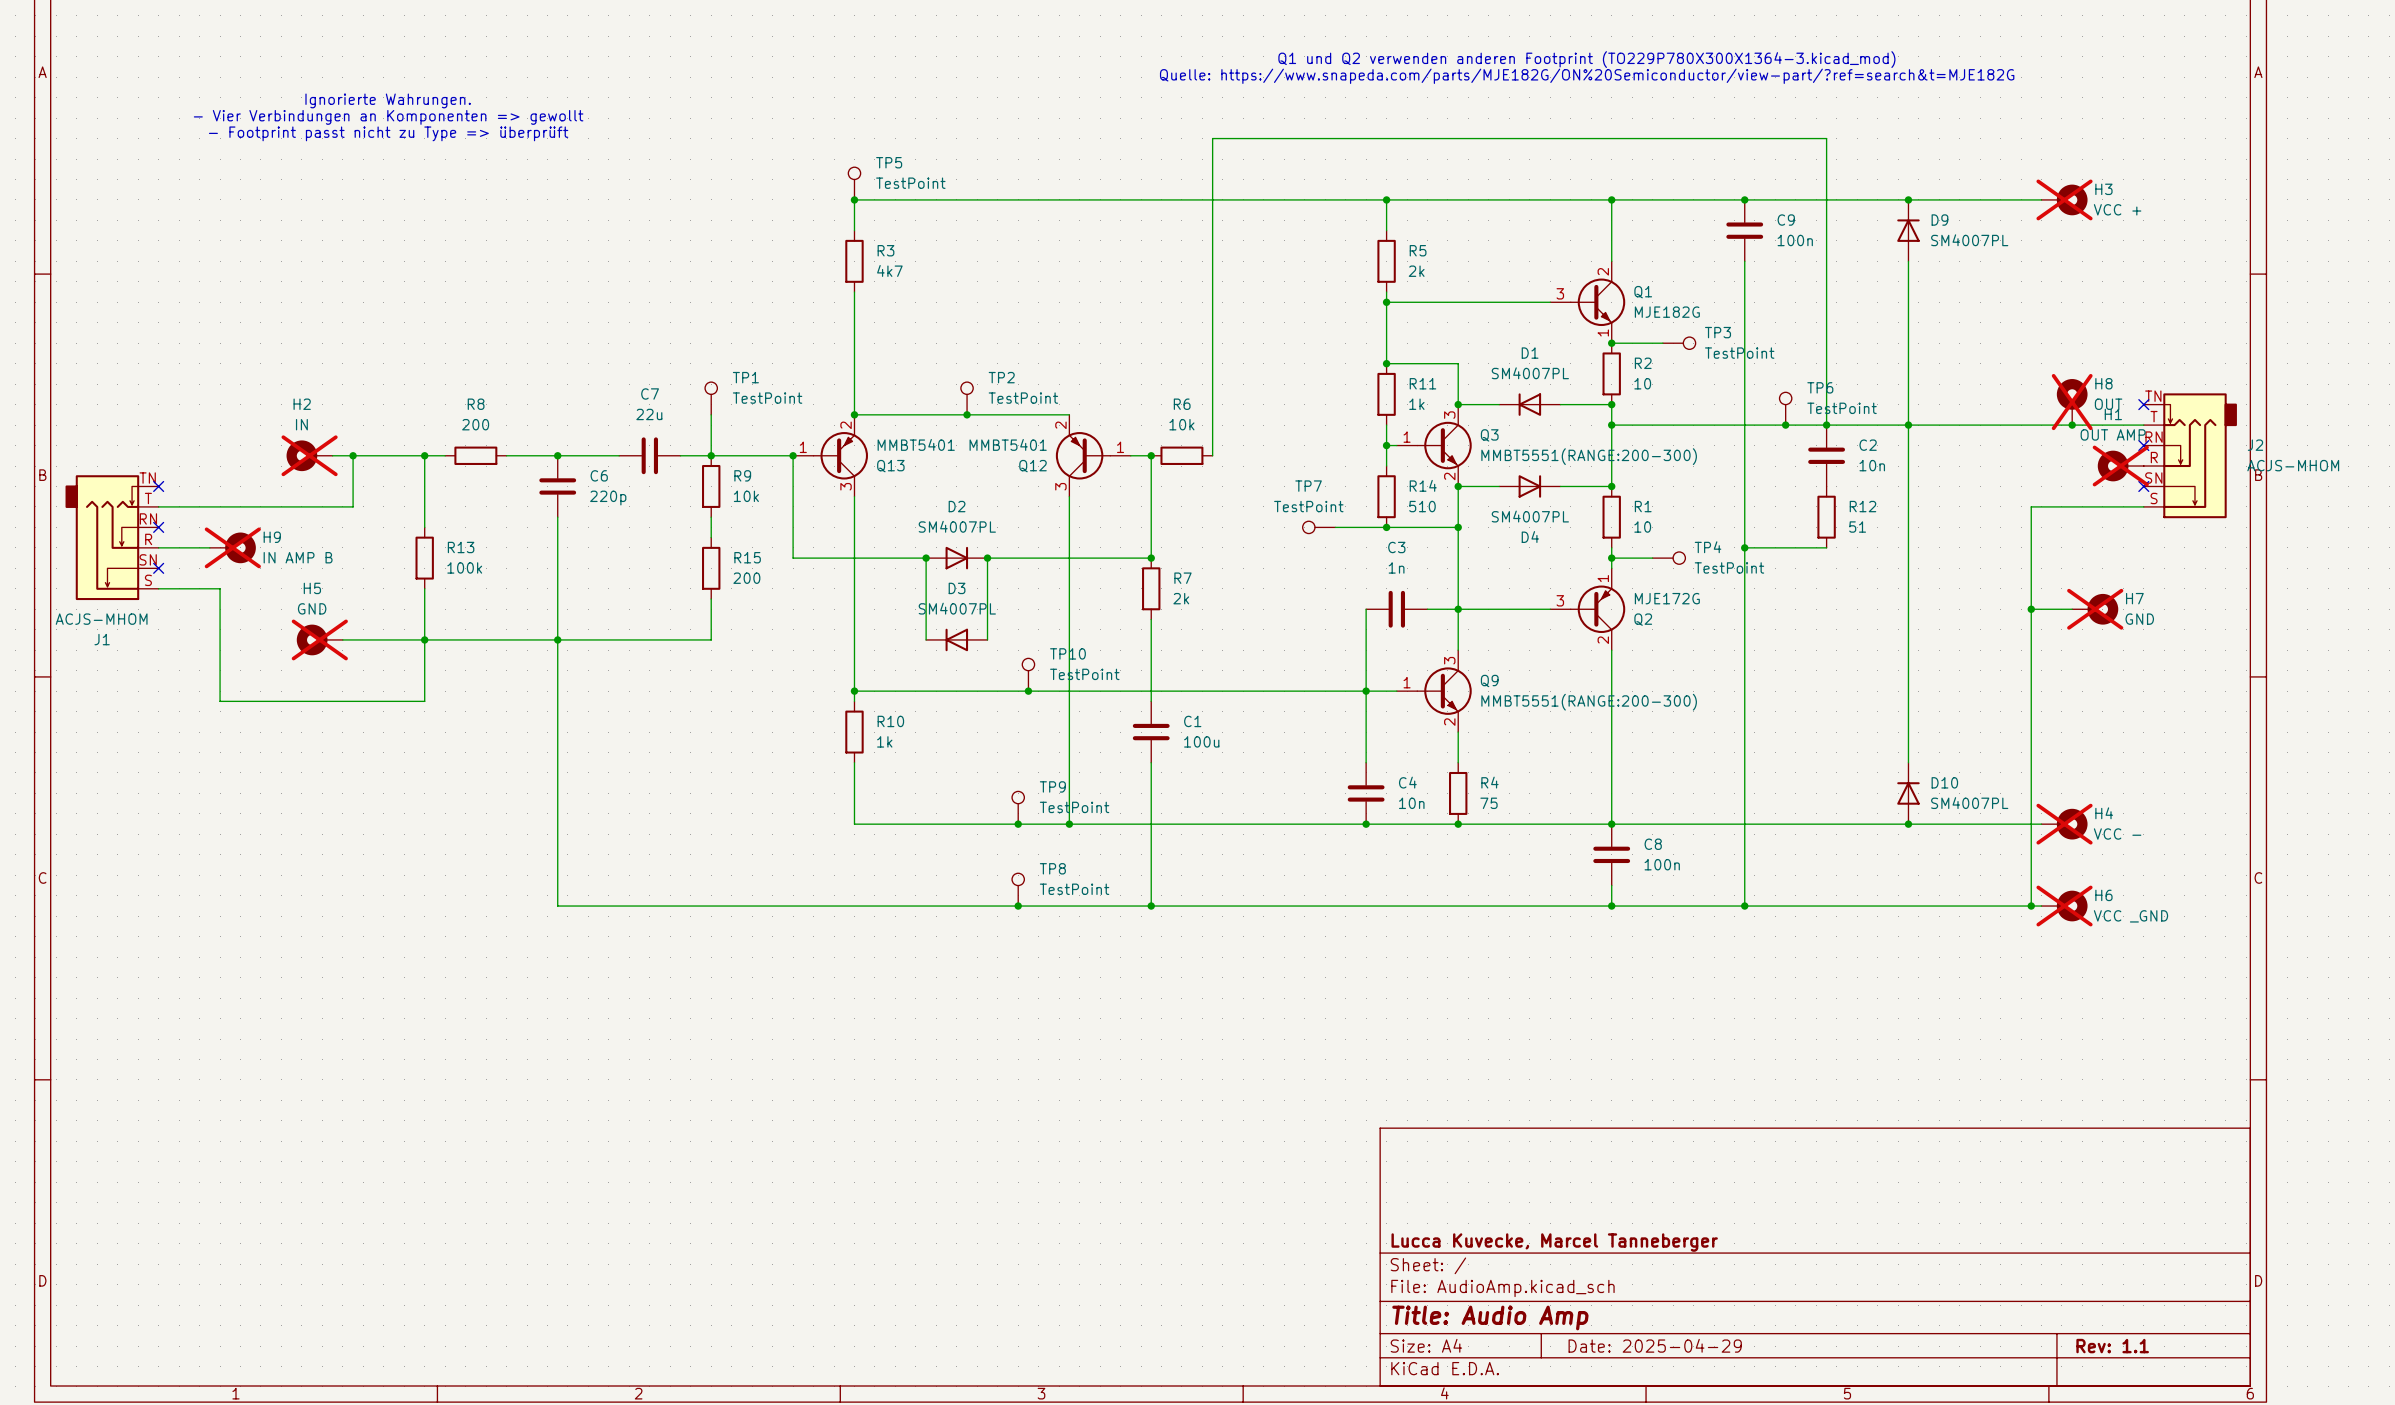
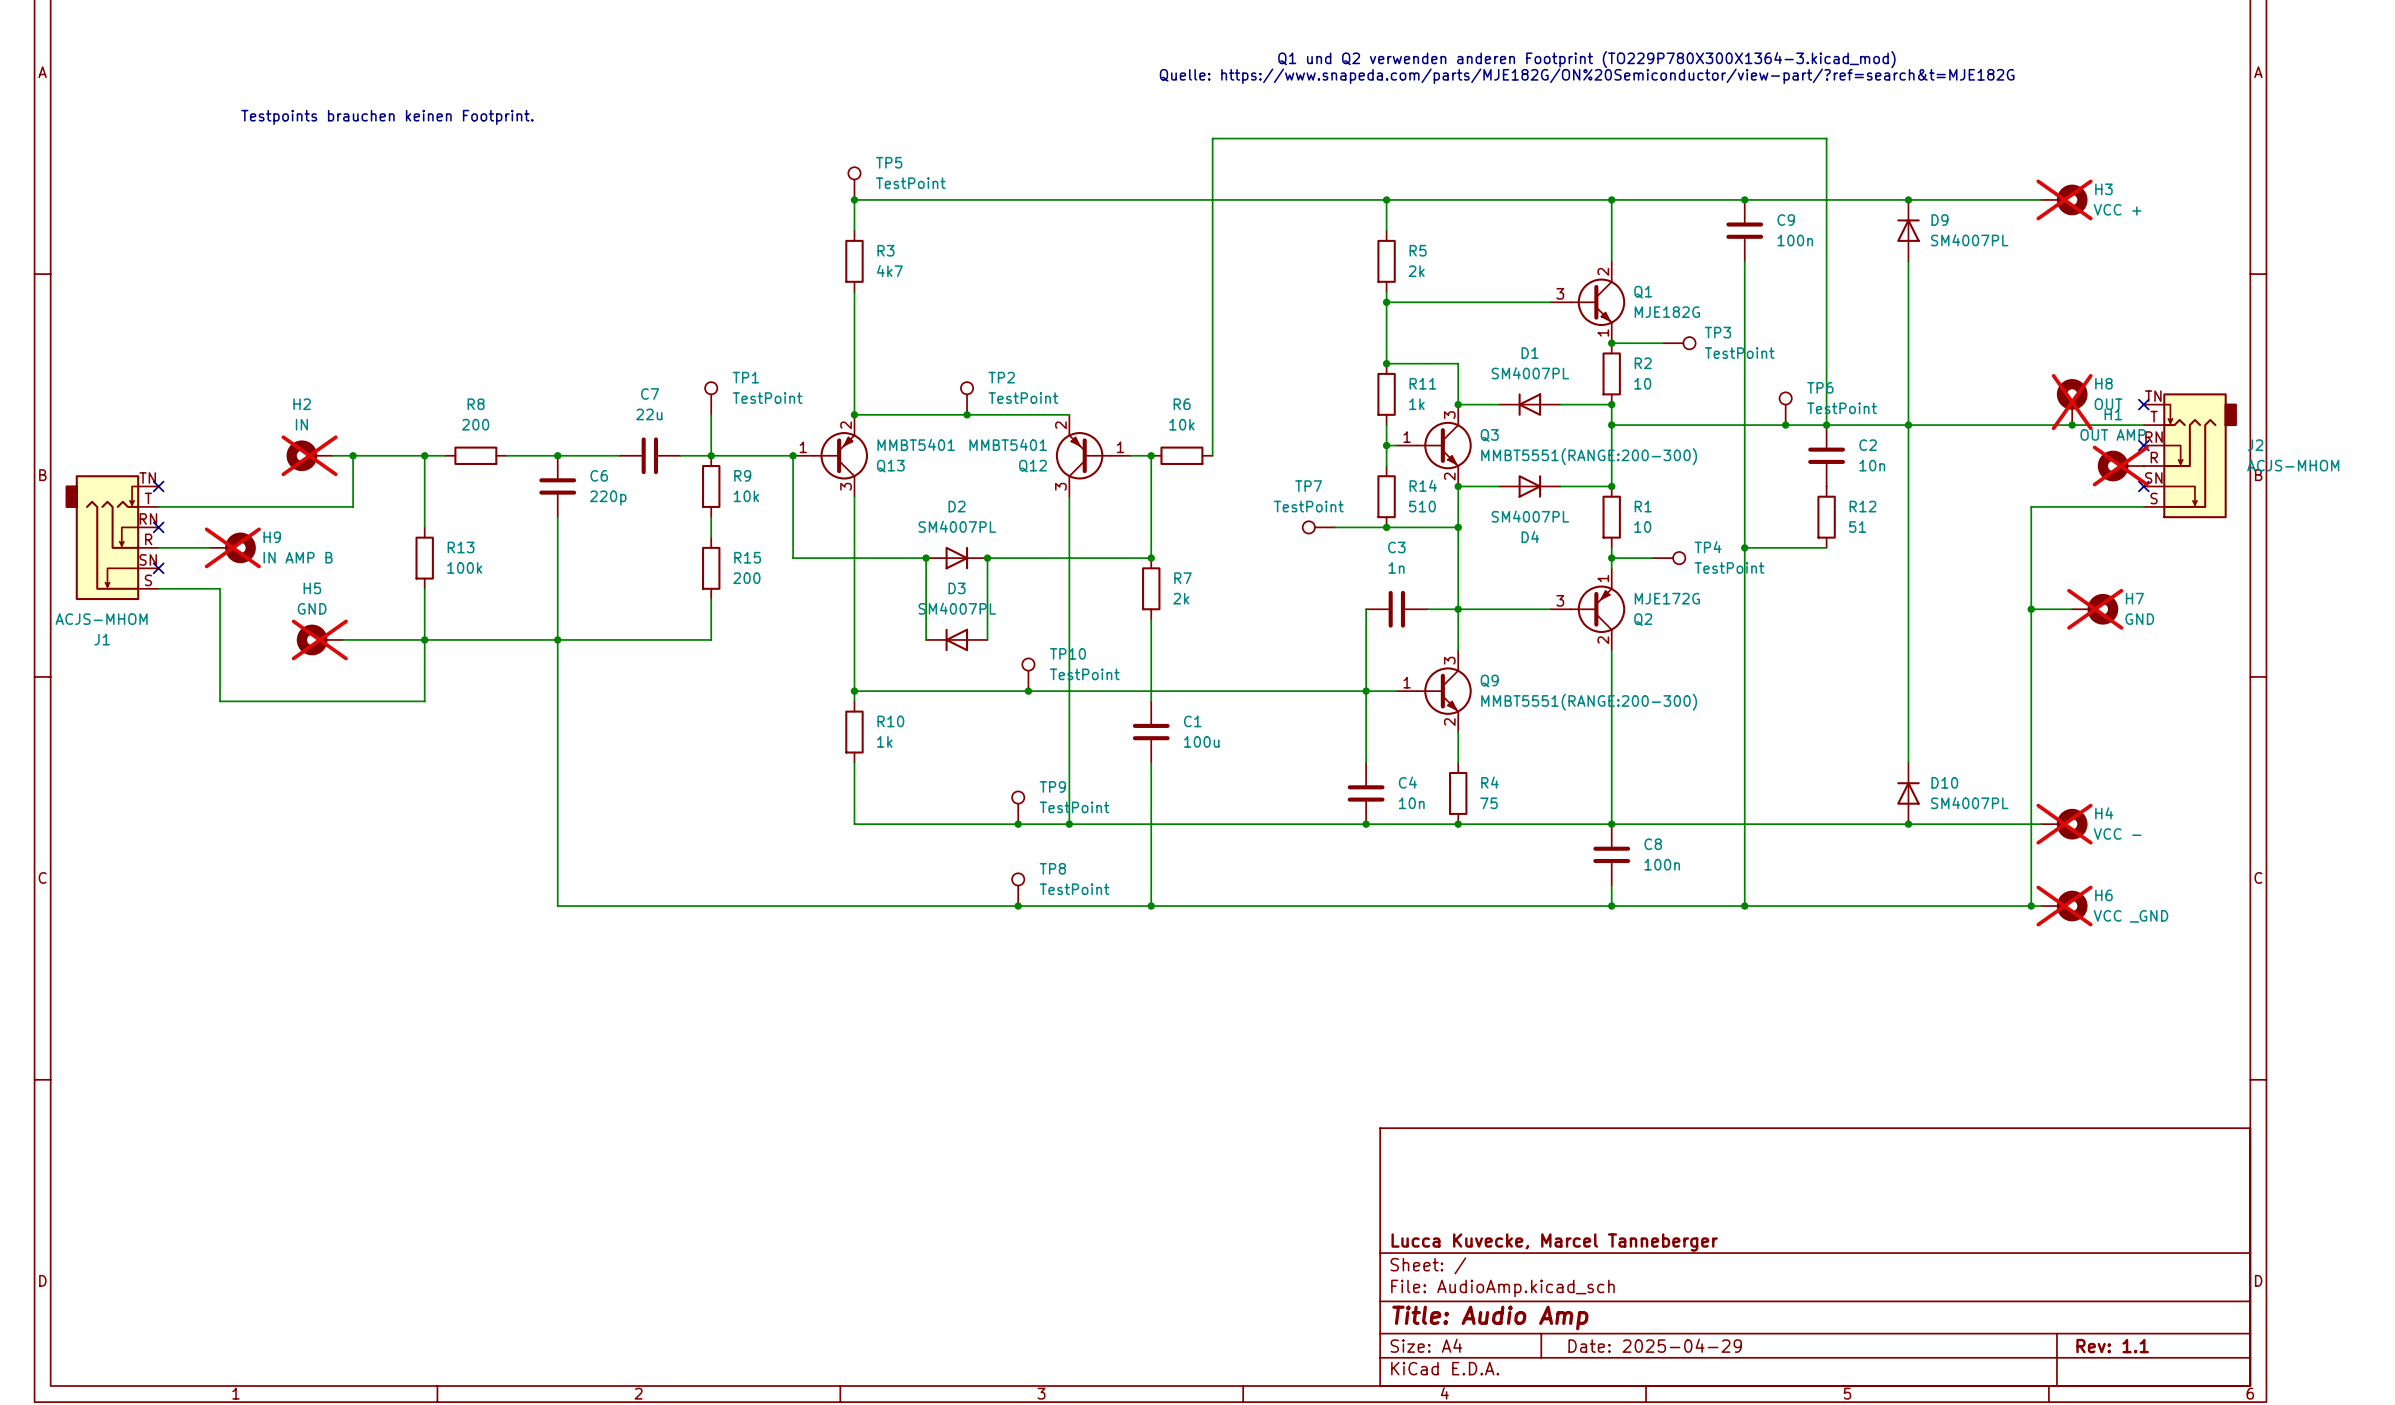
text: Ignorierte Wahrungen. (388, 100) -> none
text: - Vier Verbindungen an Komponenten => gewollt (388, 117) -> Testpoints brauchen keinen Footprint. (387, 117)
text: - Footprint passt nicht zu Type => überprüft (388, 133) -> none

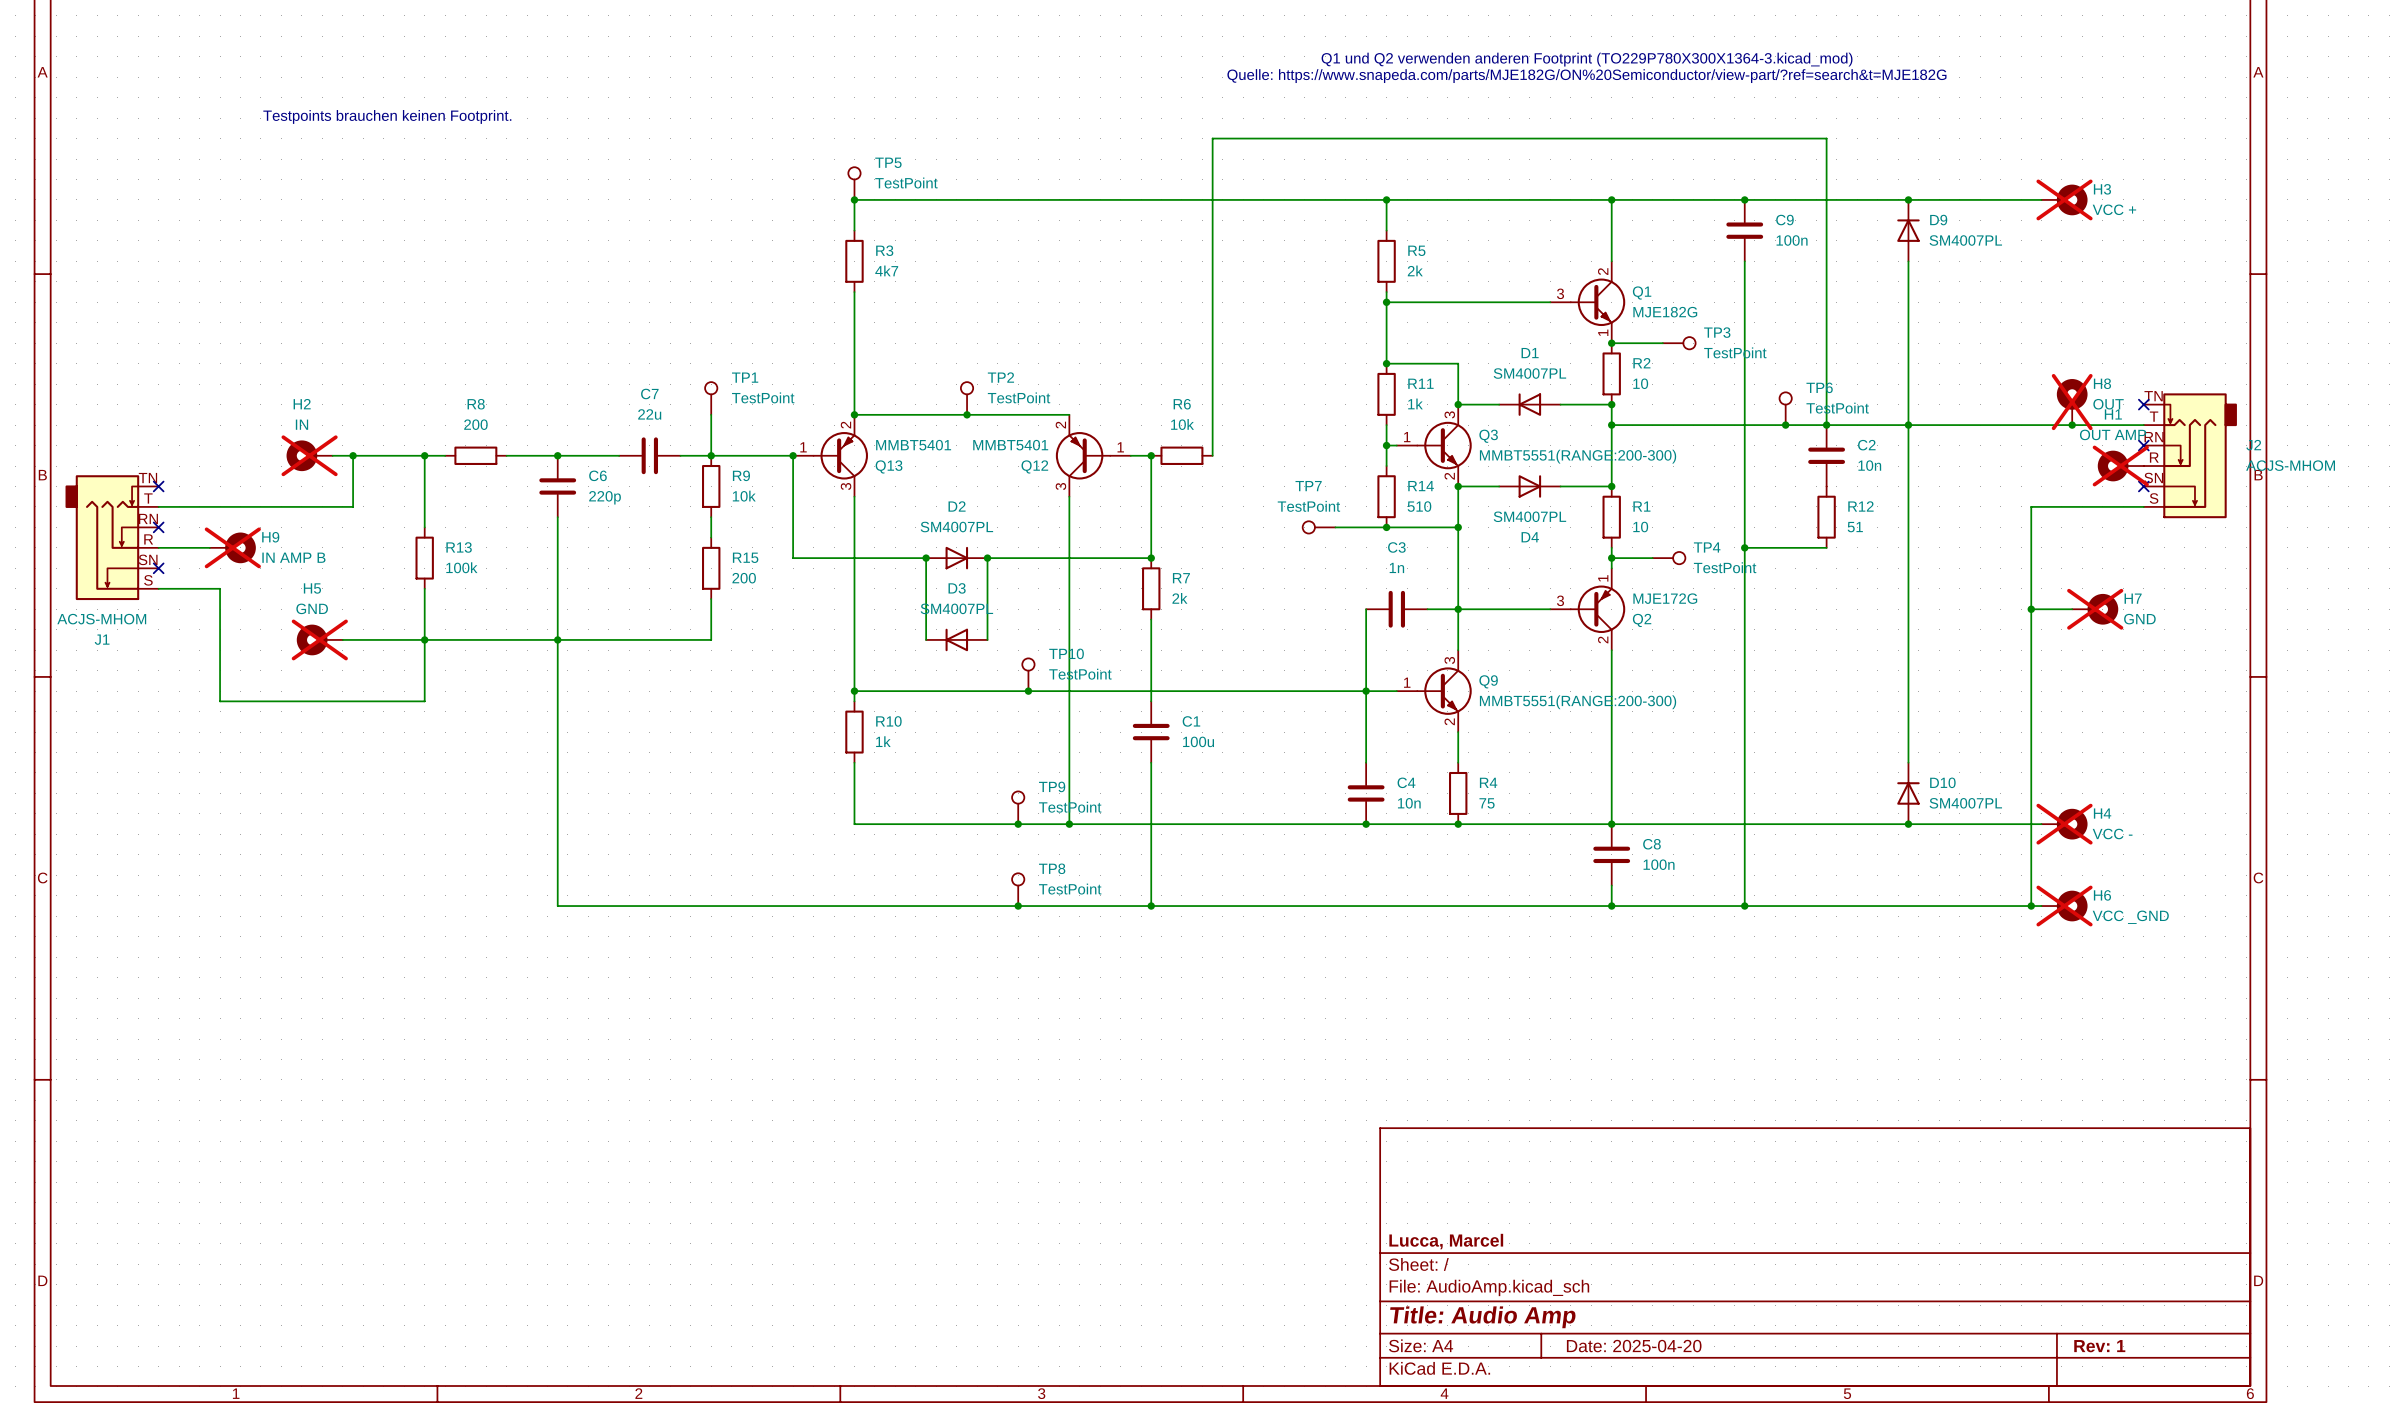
title block: Lucca Kuvecke, Marcel Tanneberger (1554, 1242) -> Lucca, Marcel (1446, 1241)
title block: Date: 2025-04-29 (1655, 1345) -> Date: 2025-04-20 (1634, 1346)
title block: Rev: 1.1 (2112, 1346) -> Rev: 1 (2099, 1346)

